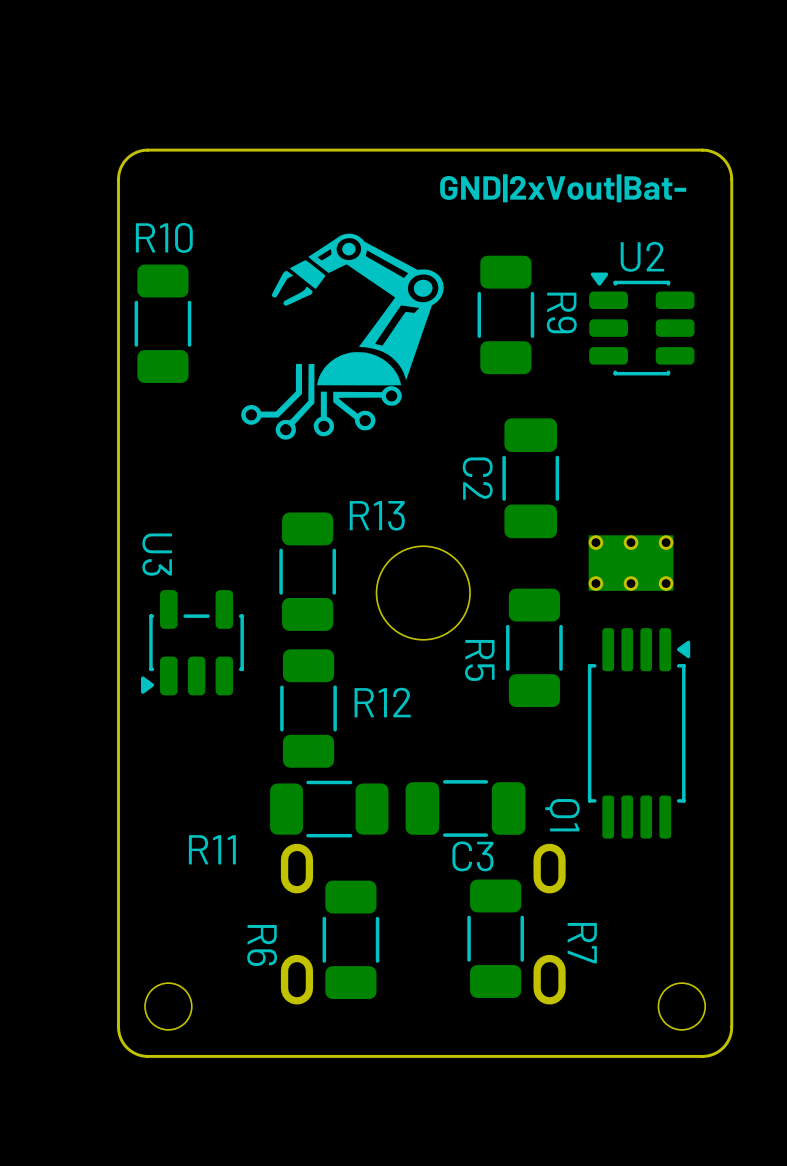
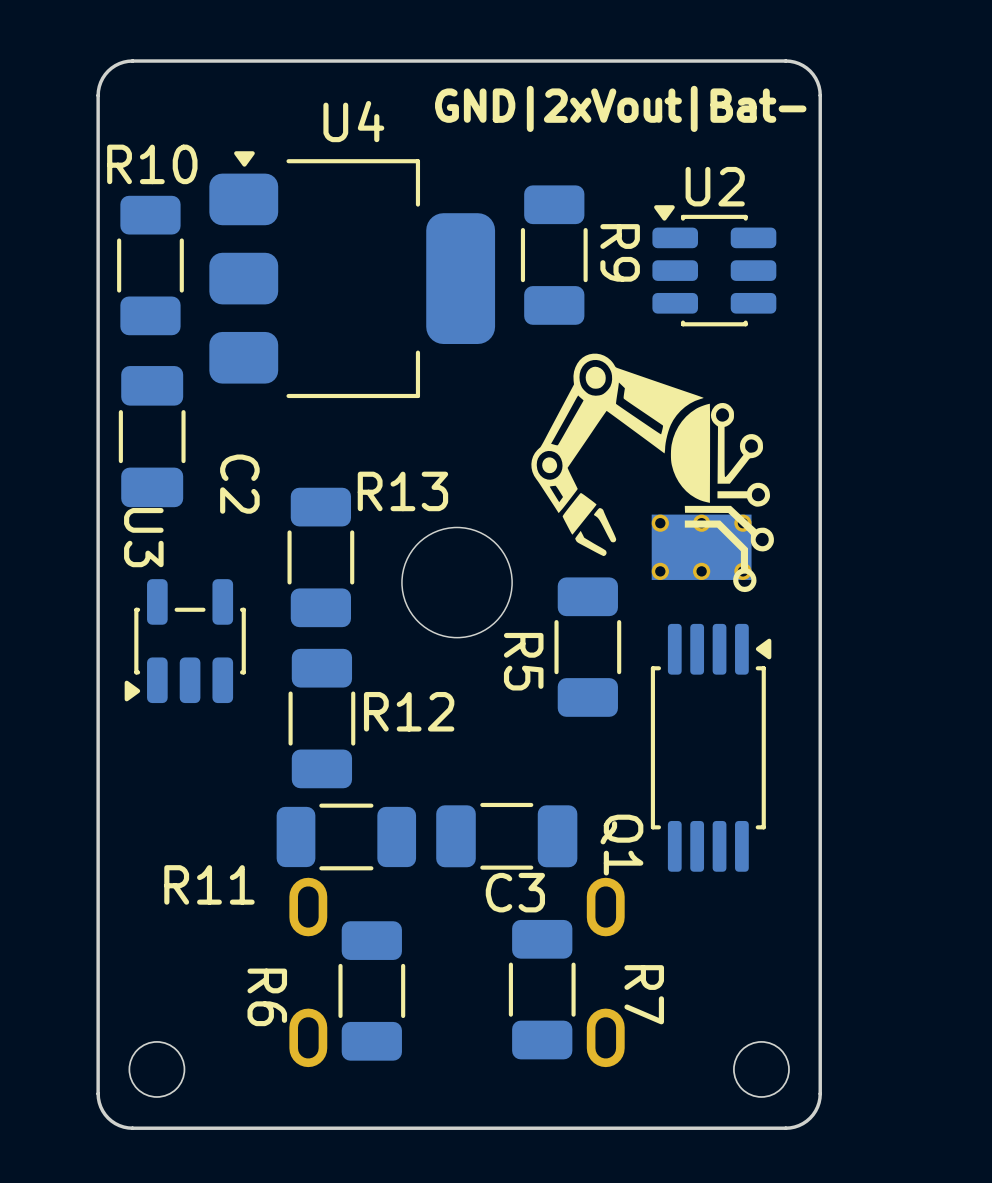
drawing: [241, 233, 444, 440] -> none
U4: none -> (352, 274)
drawing: none -> [531, 353, 774, 593]
C2 name position: C2 (477, 478) -> C2 (239, 484)
C2 position: (530, 478) -> (152, 436)

